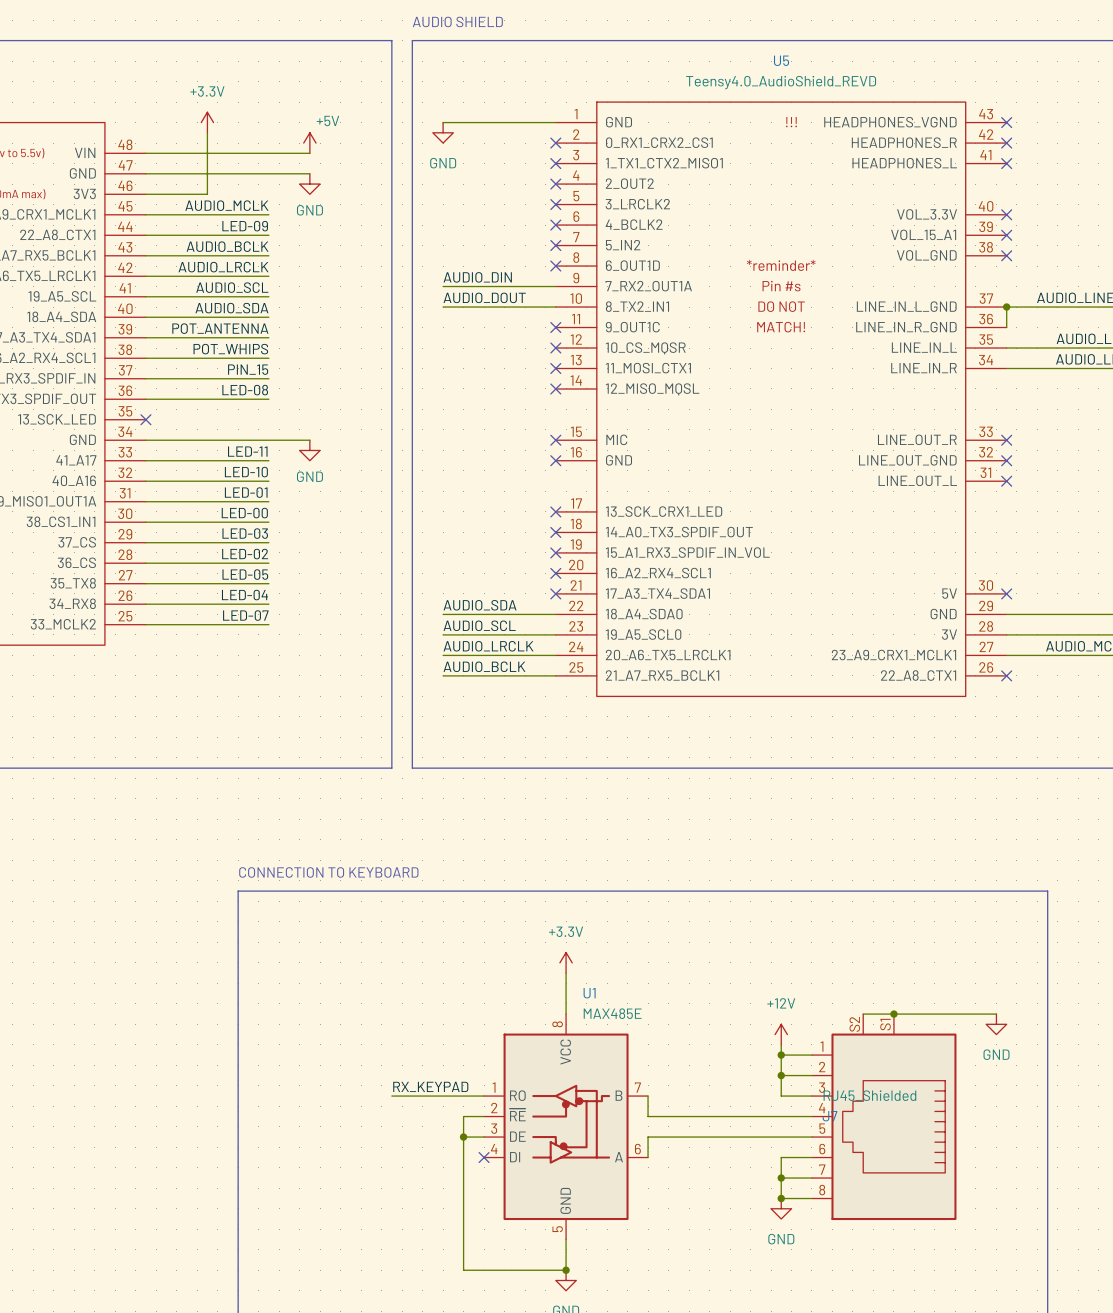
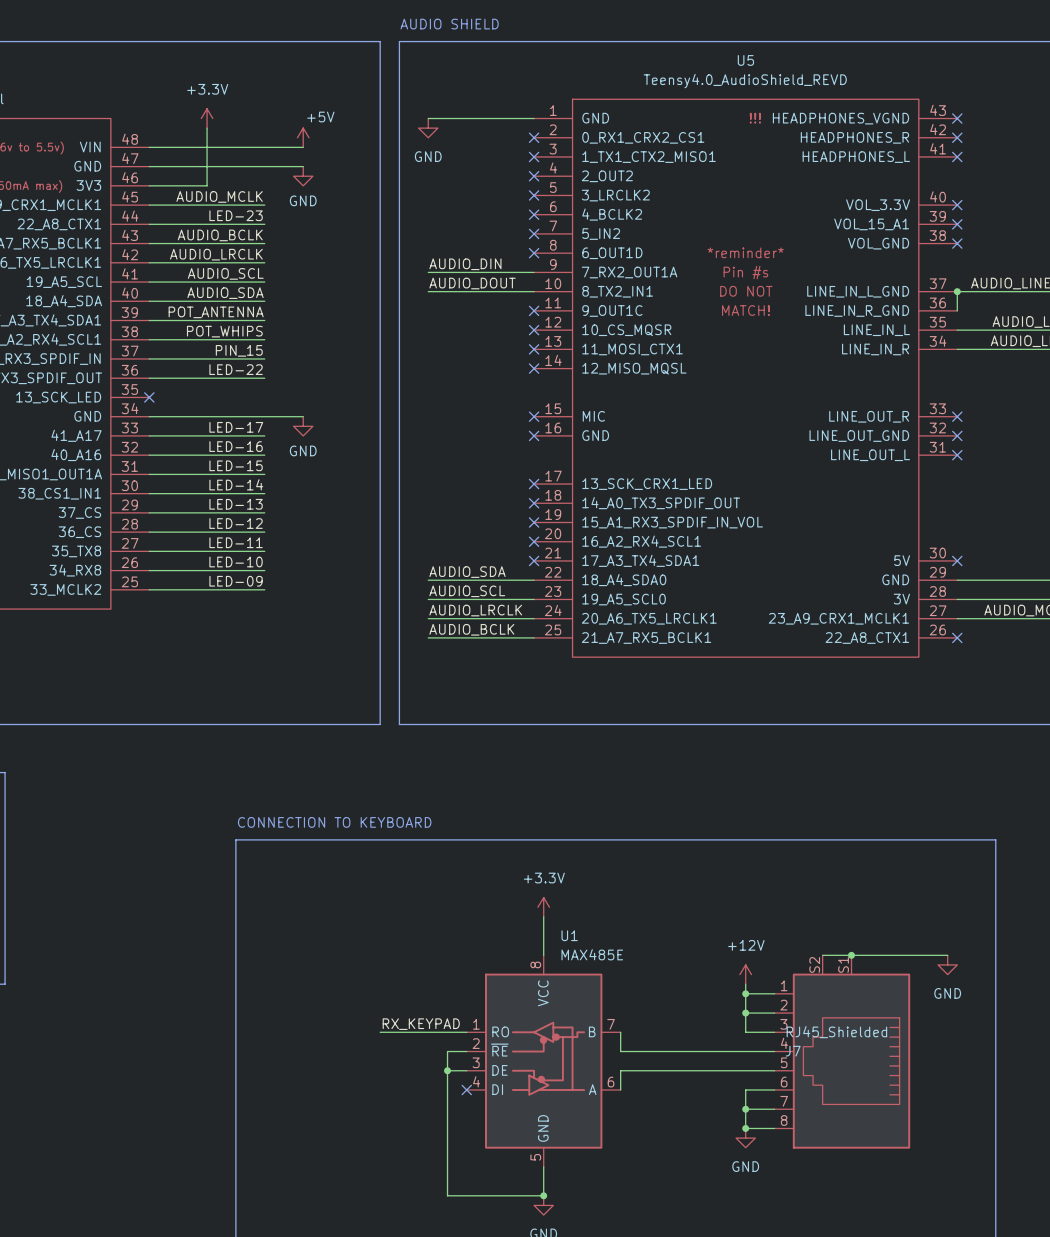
label: LED-09 (245, 226) -> LED-23 (236, 215)
label: LED-08 (245, 390) -> LED-22 (236, 369)
label: LED-11 (247, 451) -> LED-17 (236, 427)
label: LED-10 (246, 472) -> LED-16 (236, 446)
label: LED-01 (246, 492) -> LED-15 (236, 465)
label: LED-00 (244, 513) -> LED-14 (236, 484)
label: LED-03 (245, 533) -> LED-13 (236, 504)
label: LED-02 (245, 554) -> LED-12 (236, 523)
label: LED-05 (245, 574) -> LED-11 (236, 542)
label: LED-04 (244, 595) -> LED-10 (236, 562)
label: LED-07 (245, 615) -> LED-09 (236, 581)

